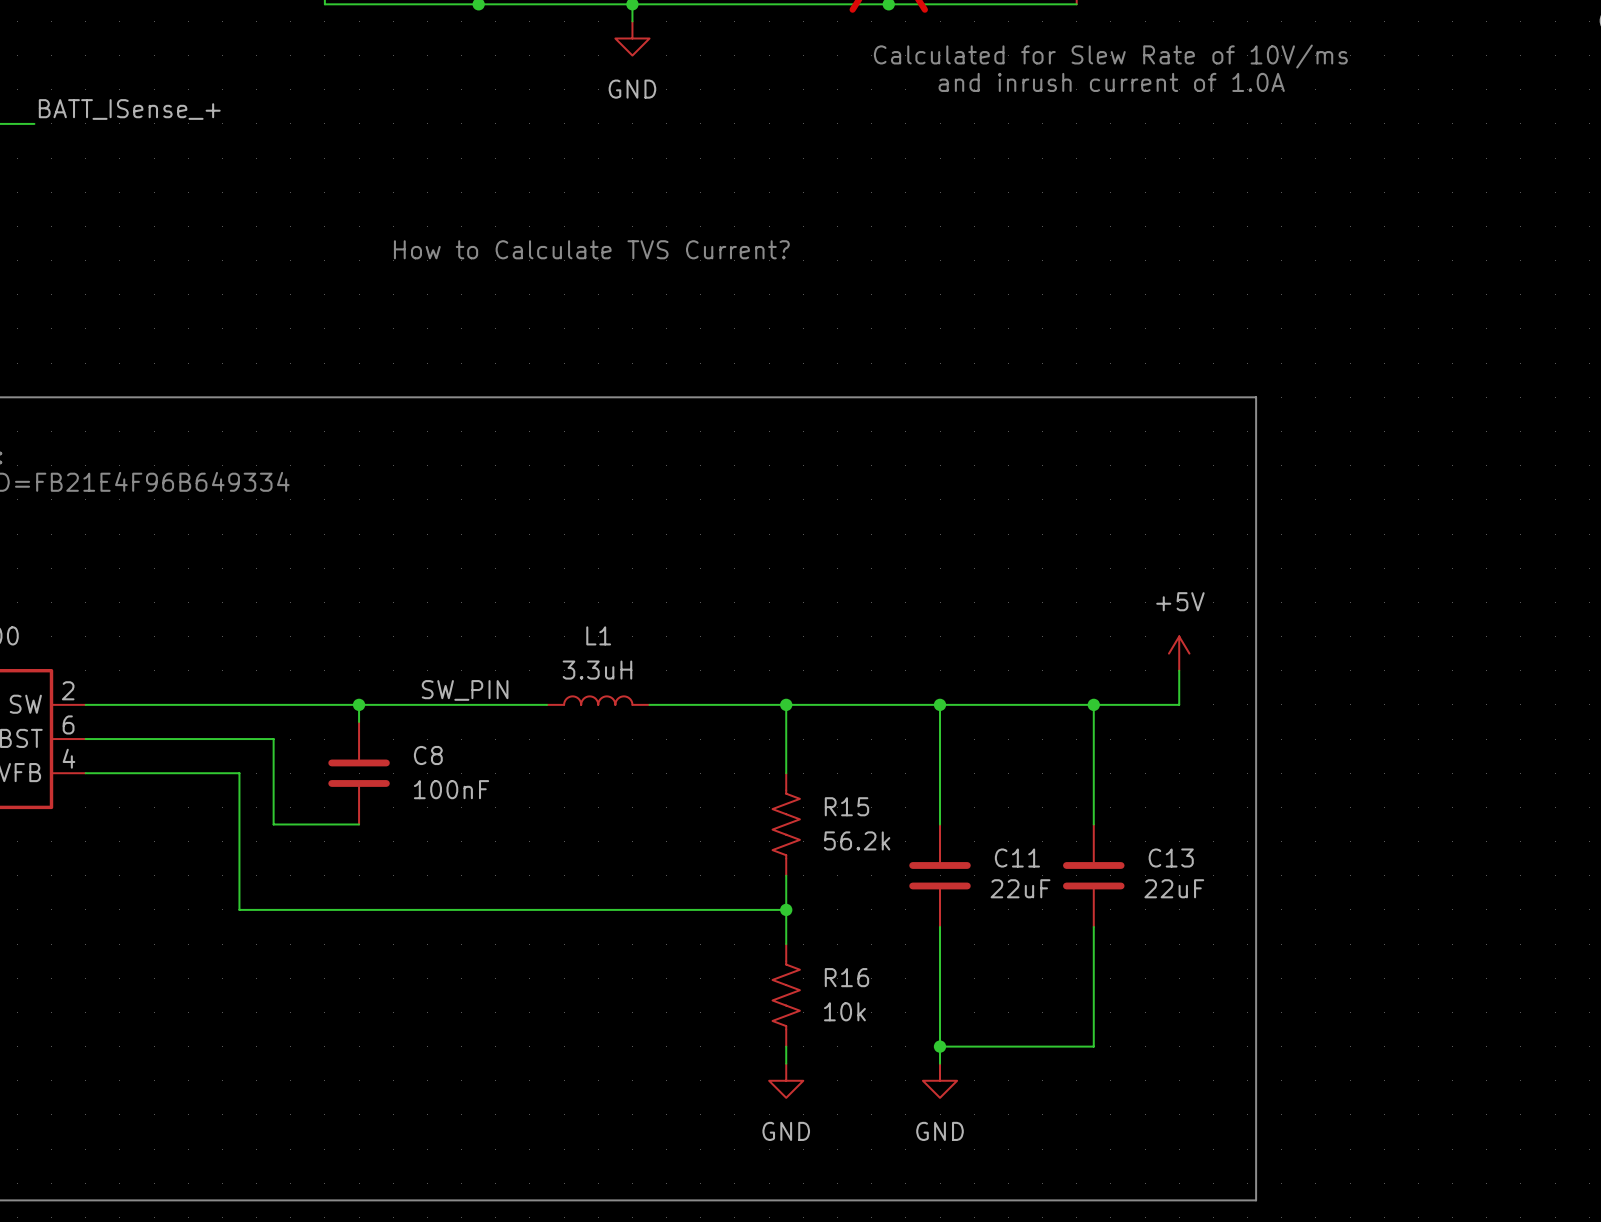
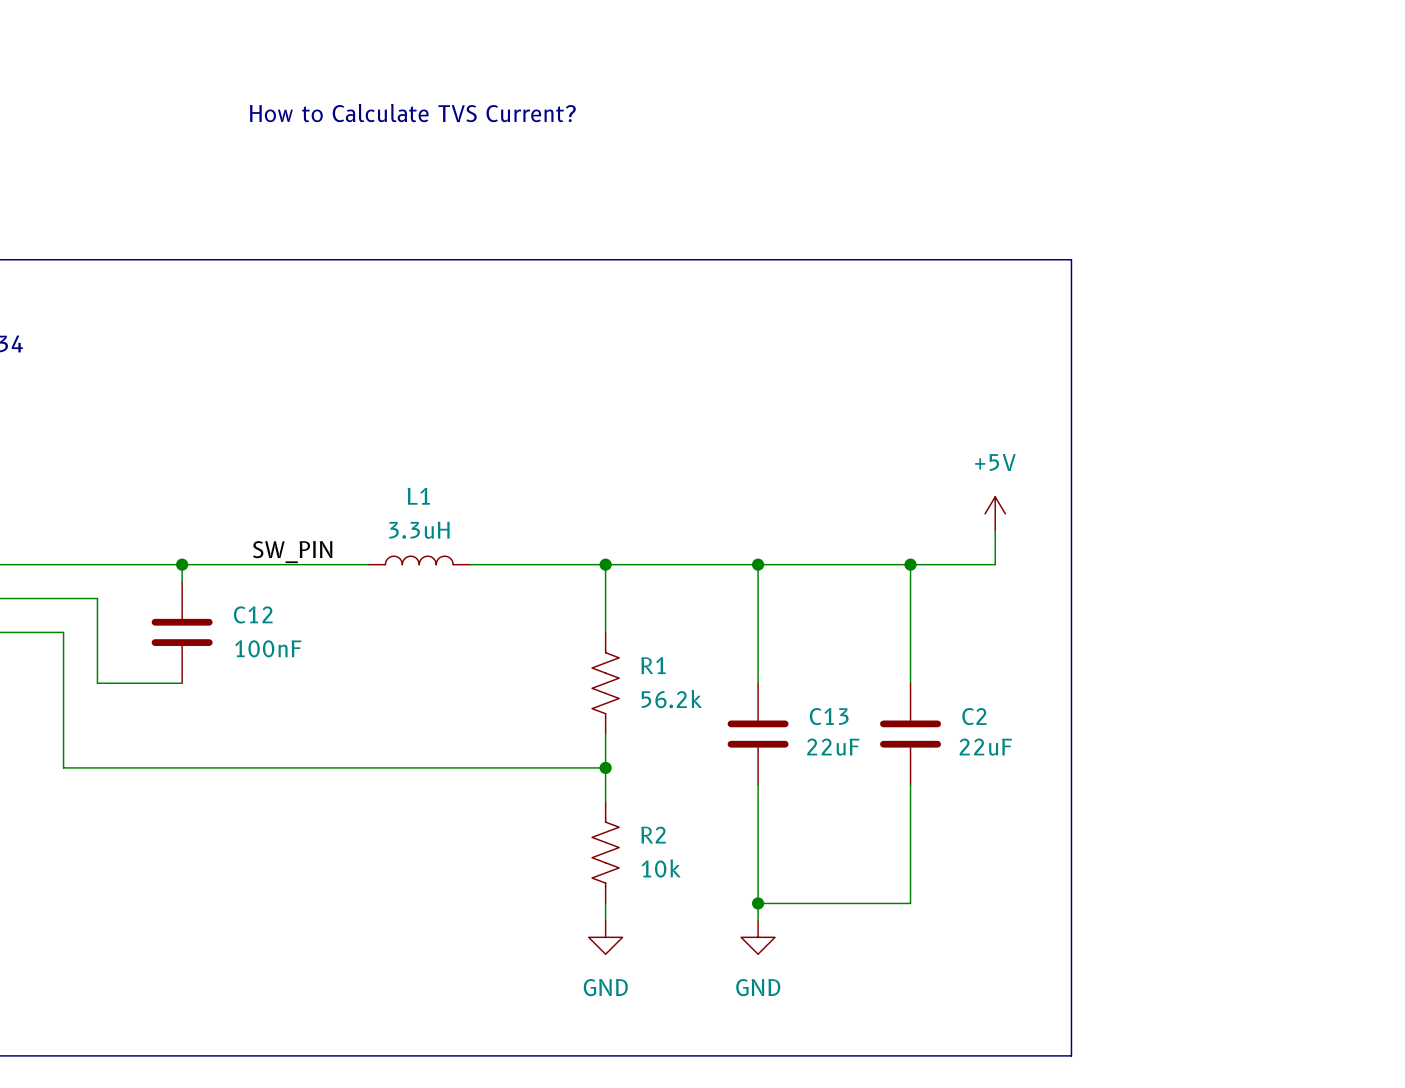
C8 name: C8 (428, 755) -> C12 (253, 614)
R15 name: R15 (846, 806) -> R1 (653, 665)
C11 name: C11 (1017, 858) -> C13 (829, 716)
C13 name: C13 (1171, 858) -> C2 (974, 716)
R16 name: R16 (846, 977) -> R2 (653, 835)

